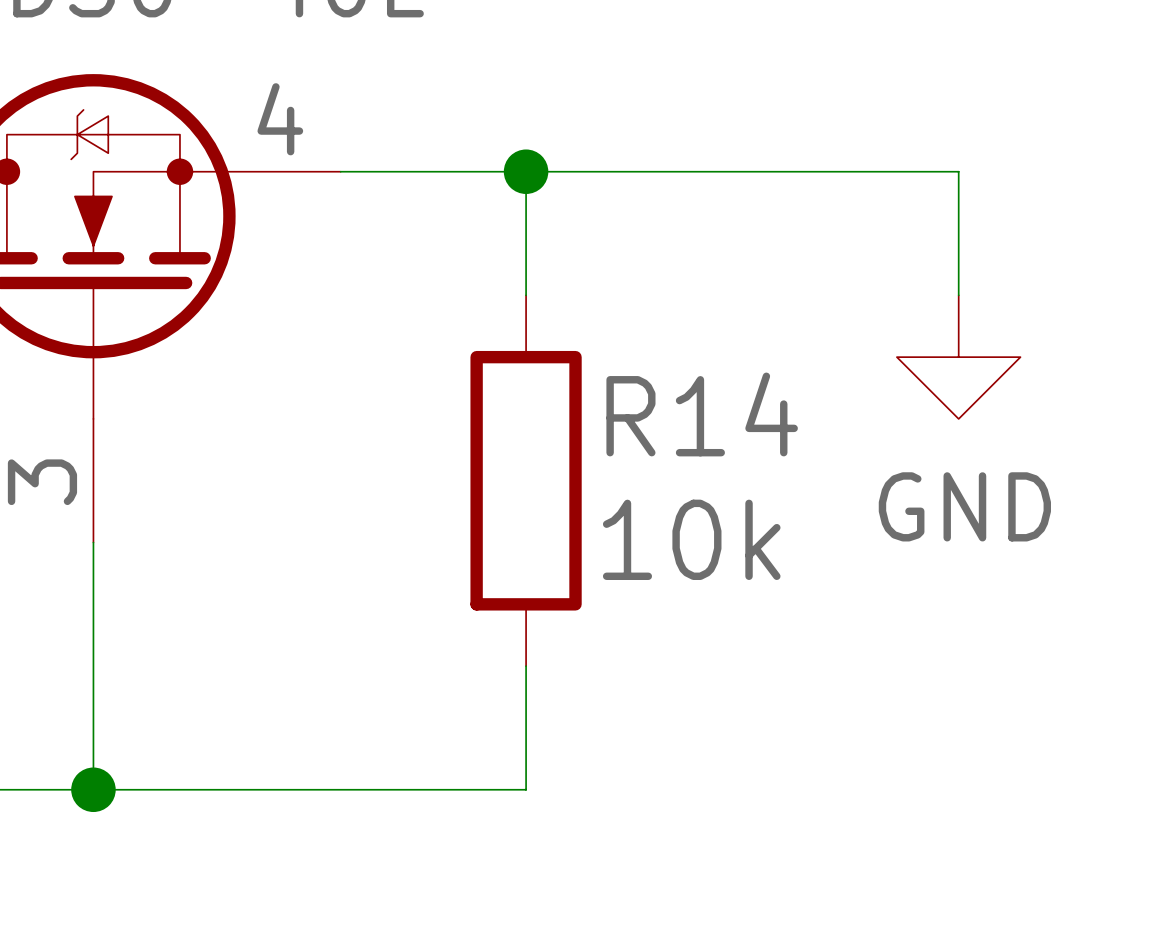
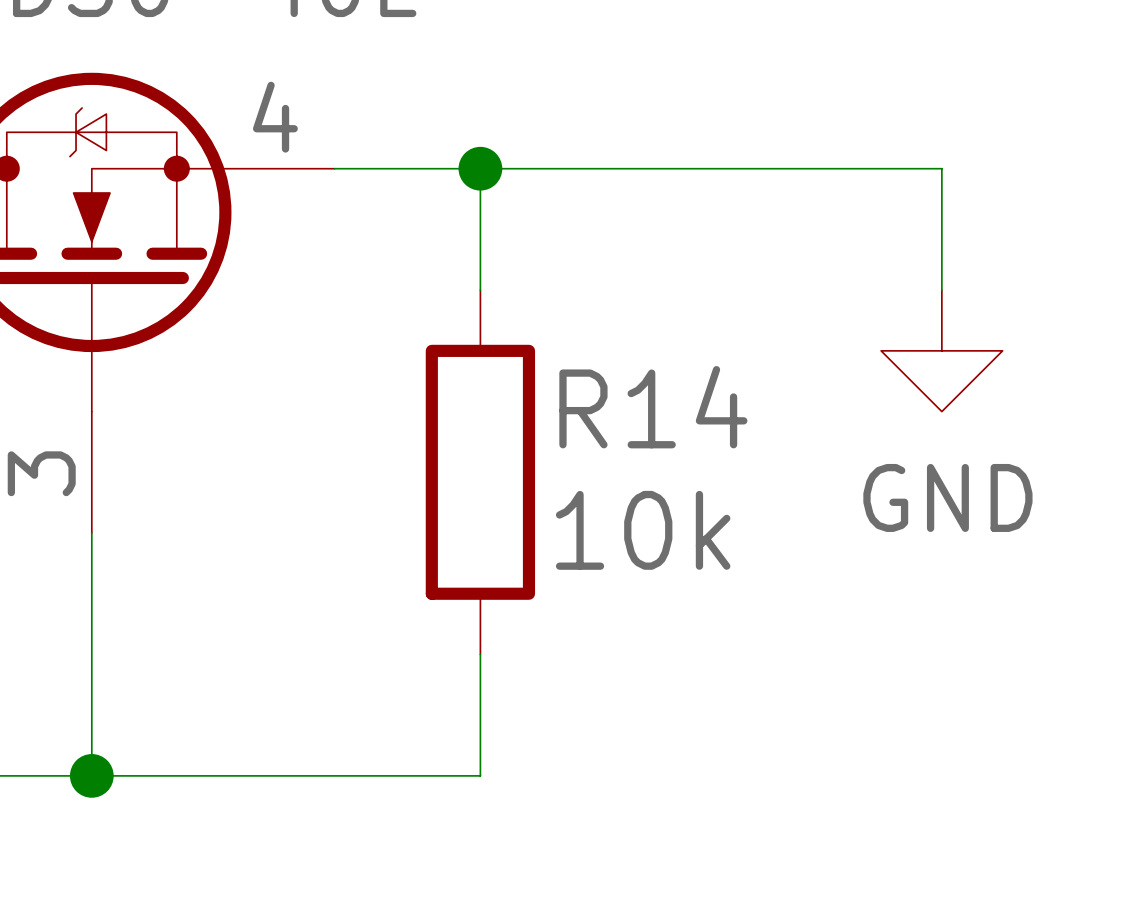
wire: (526, 171) (526, 295) -> (480, 168) (480, 290)
junction position: (526, 171) -> (480, 168)
R14 position: (526, 480) -> (480, 472)
wire: (526, 666) (526, 789) (488, 789) -> (480, 654) (480, 775)

